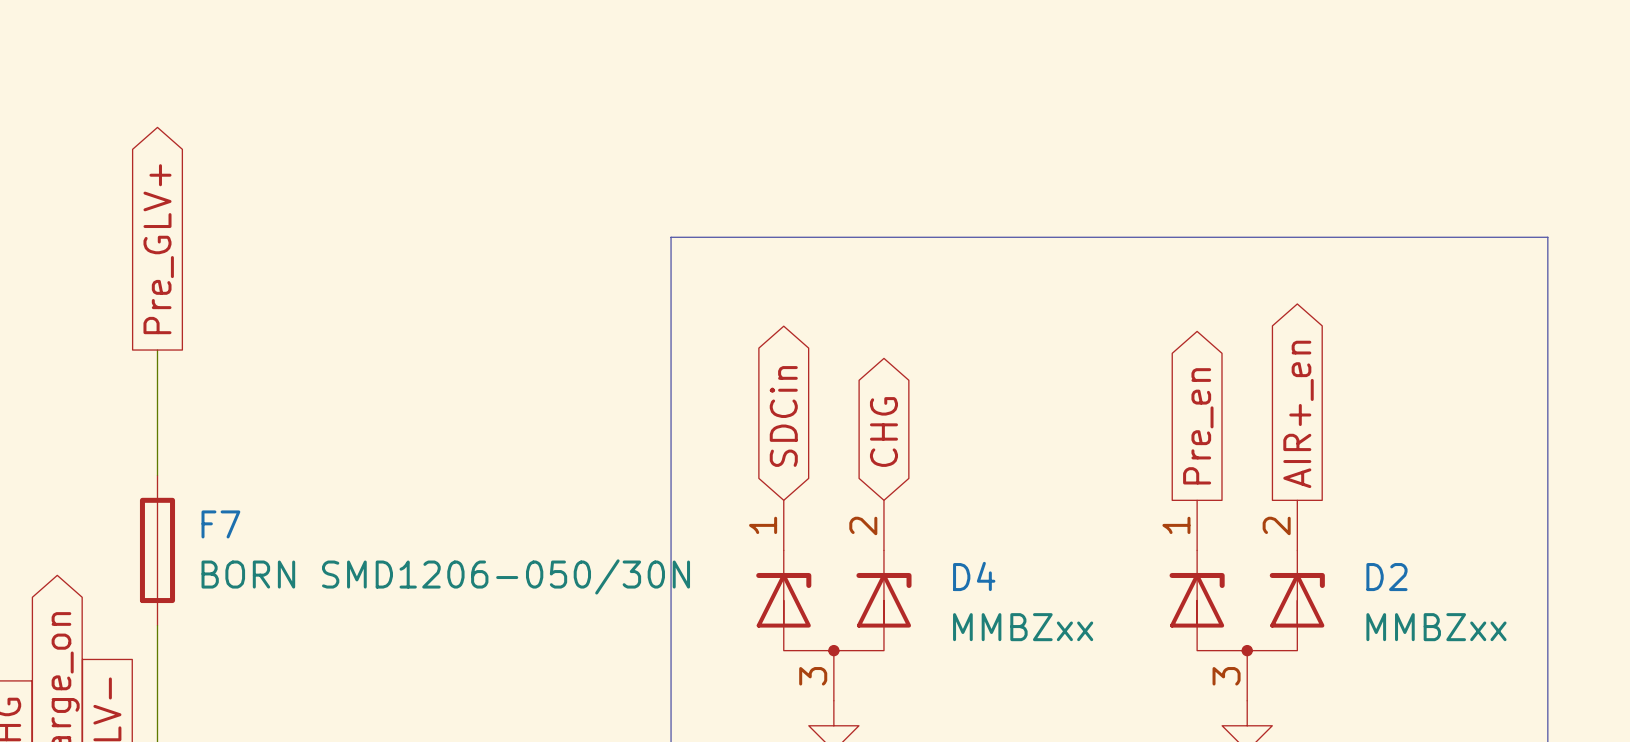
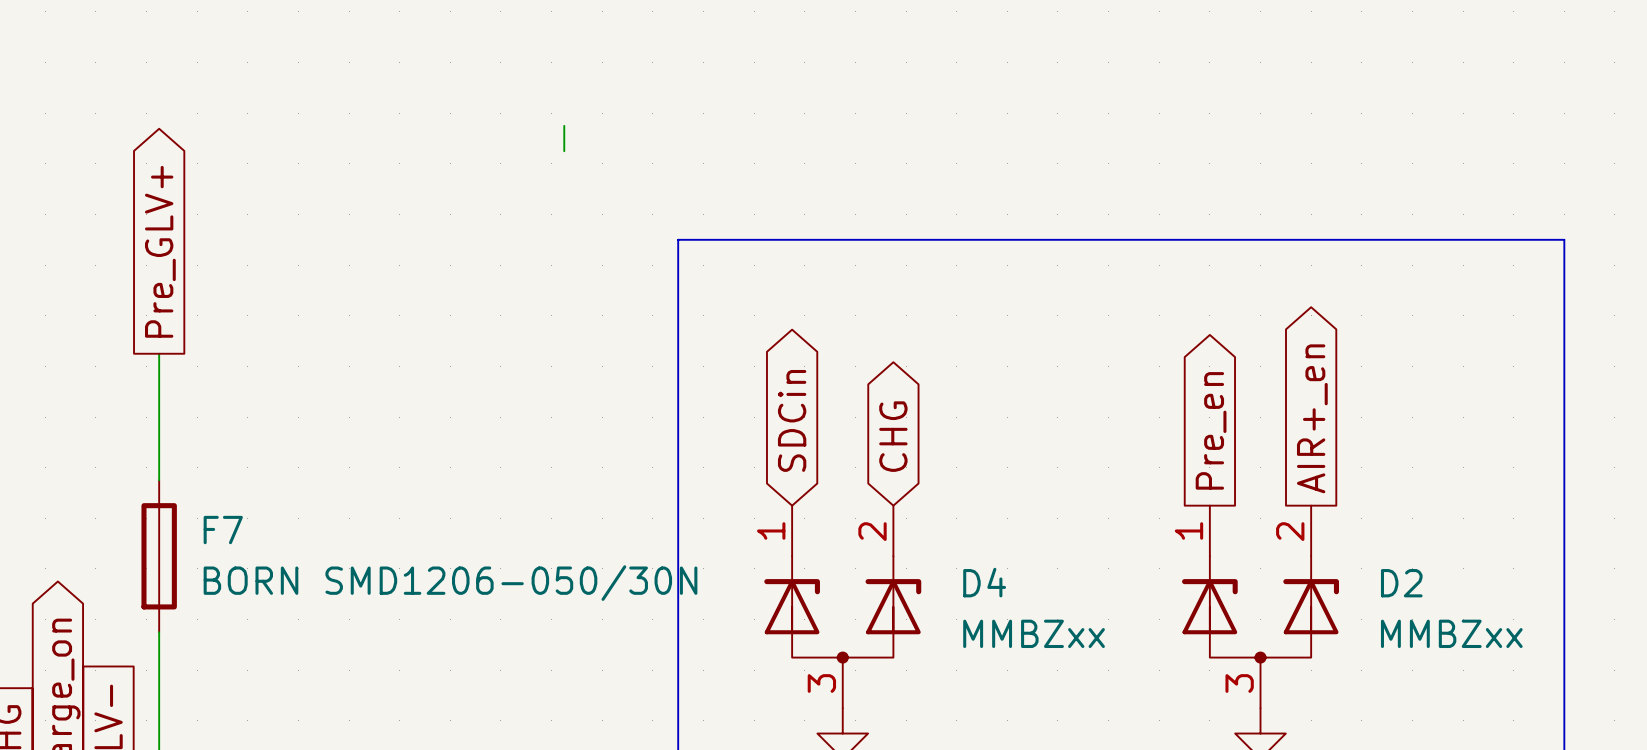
wire: none -> (564, 125) (564, 151)

